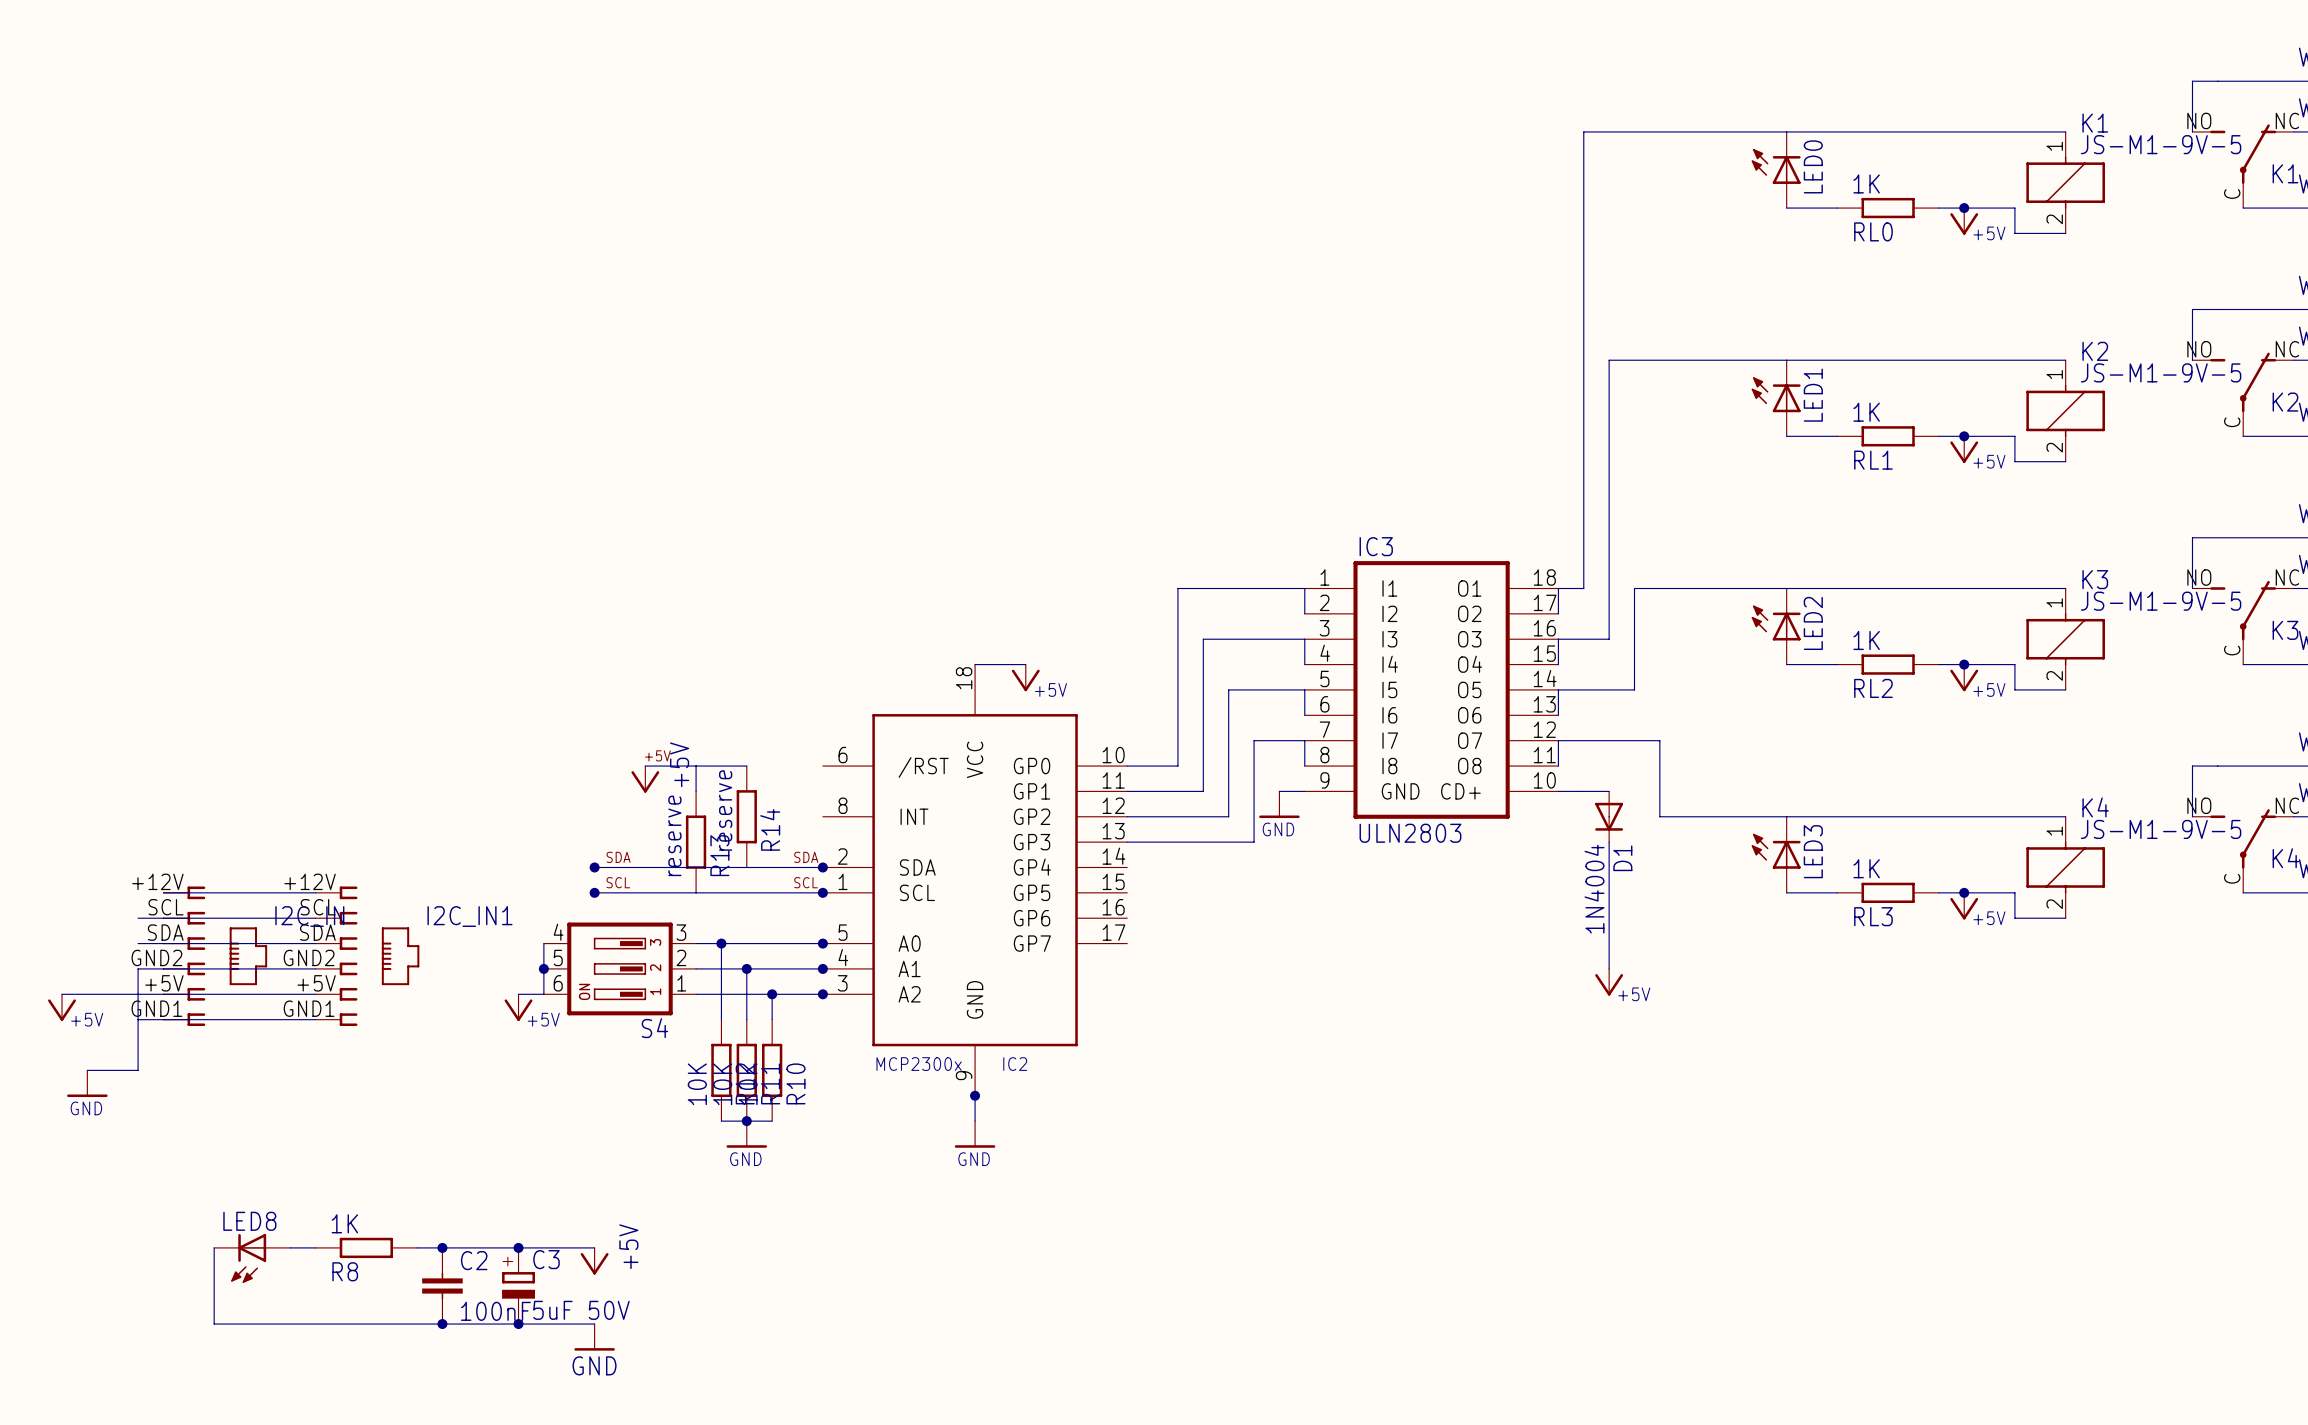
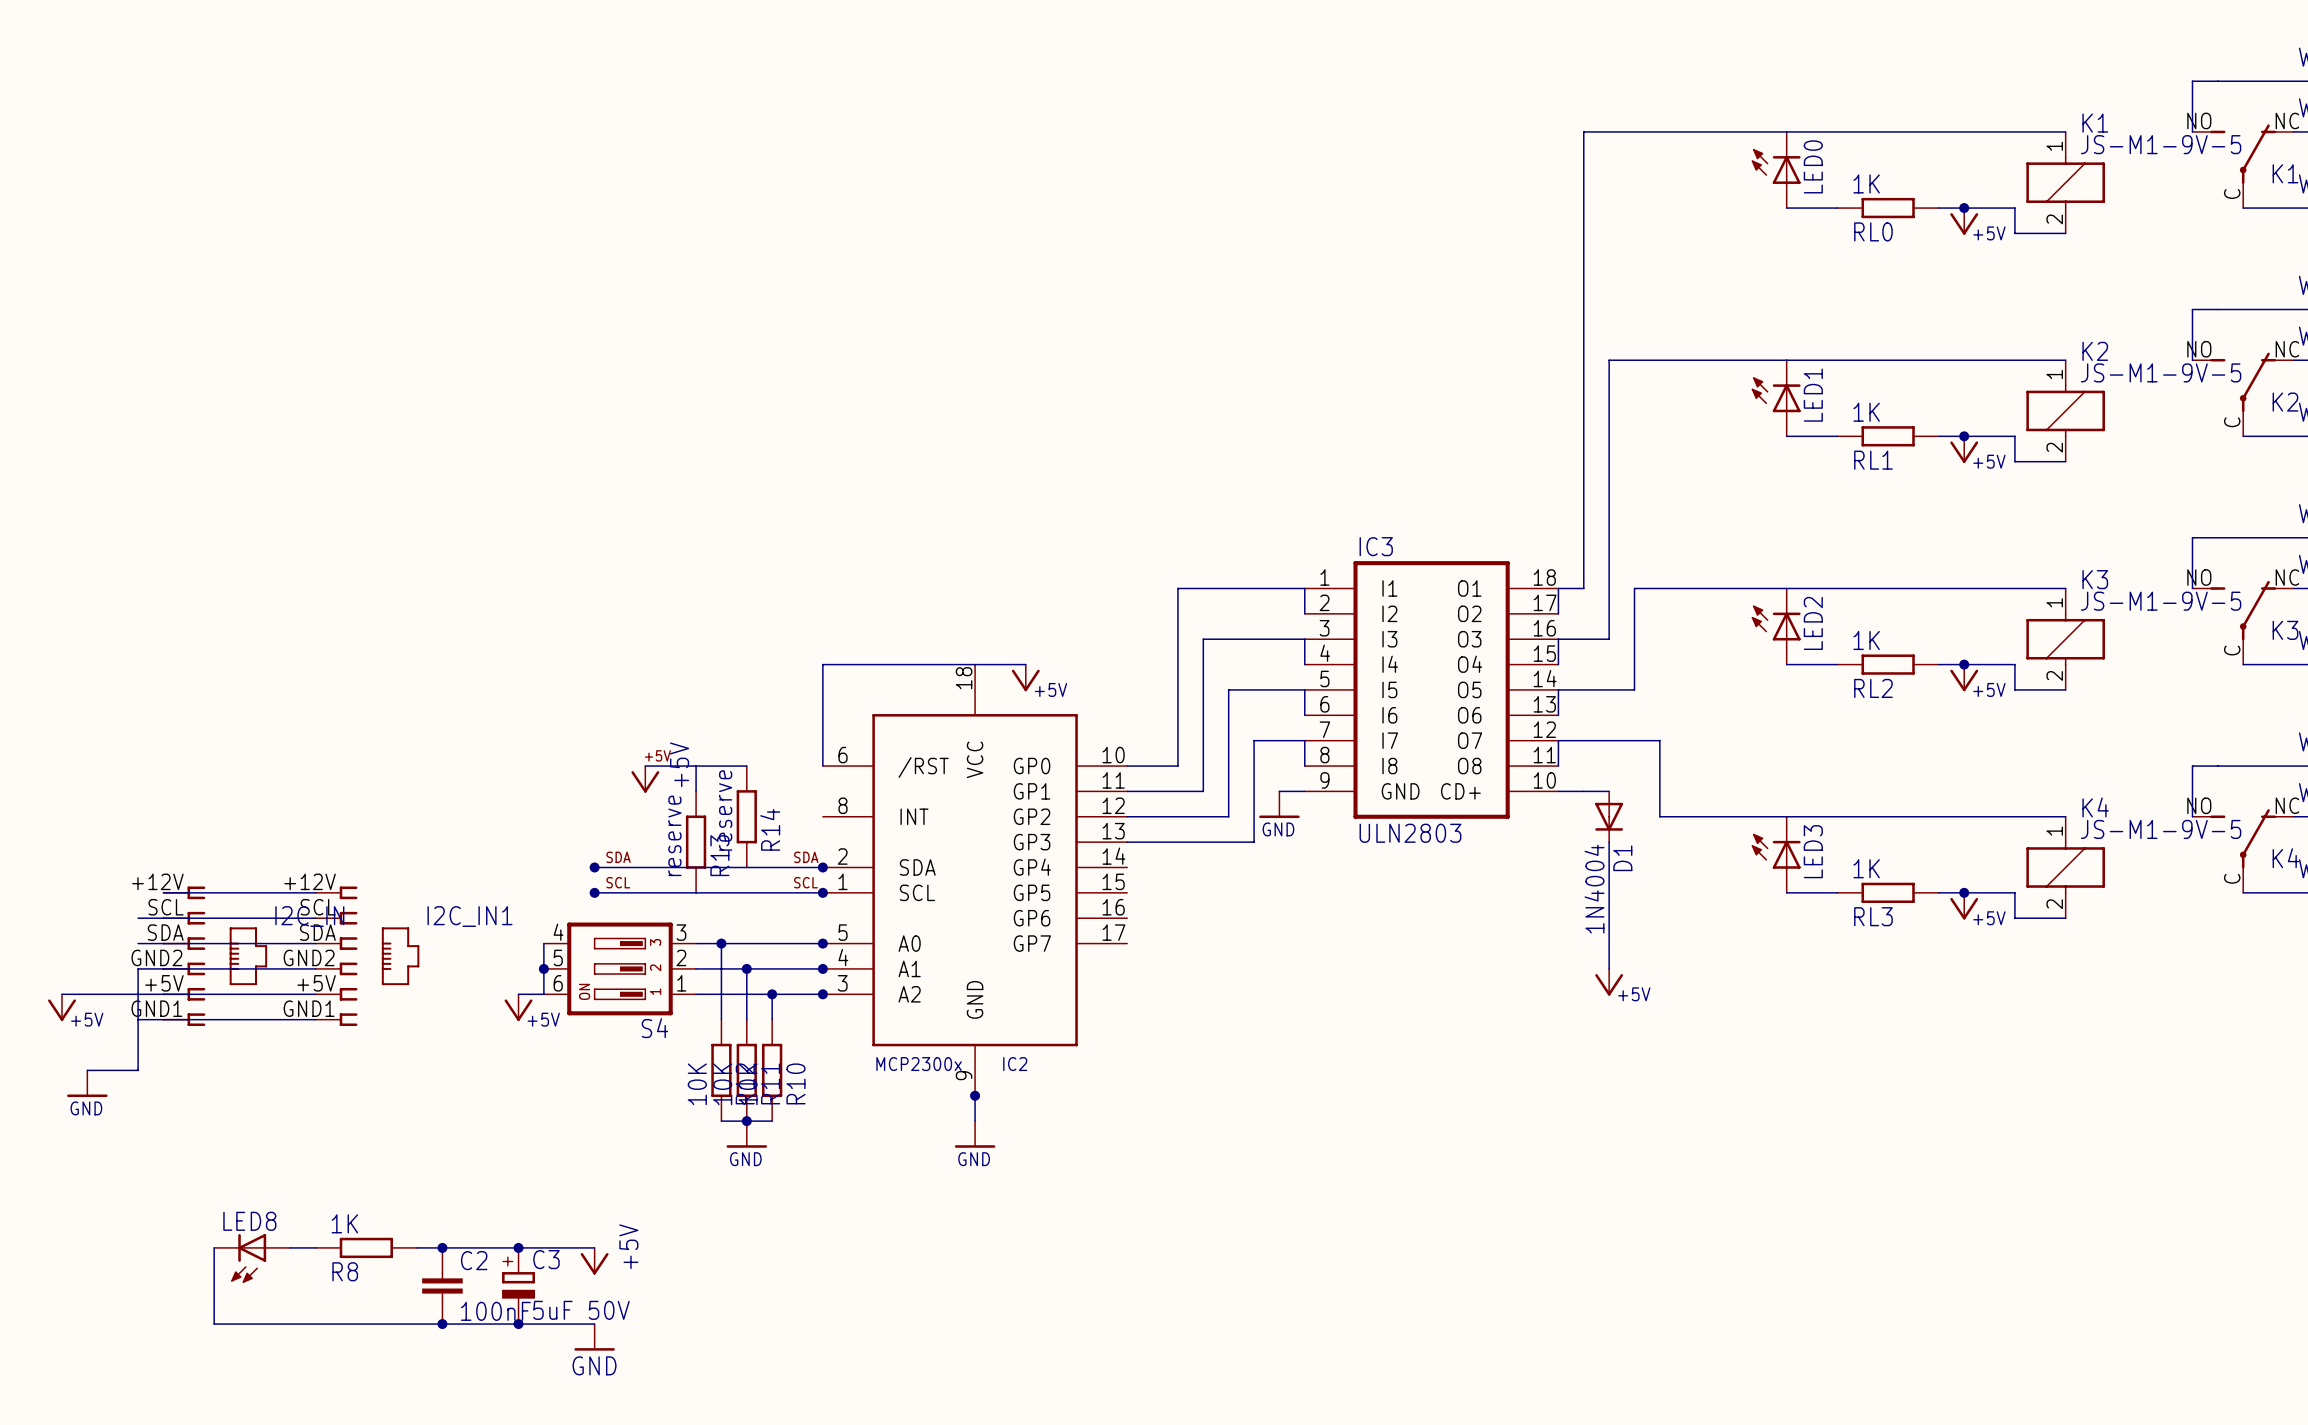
wire: none -> (975, 664) (822, 664) (822, 766)

